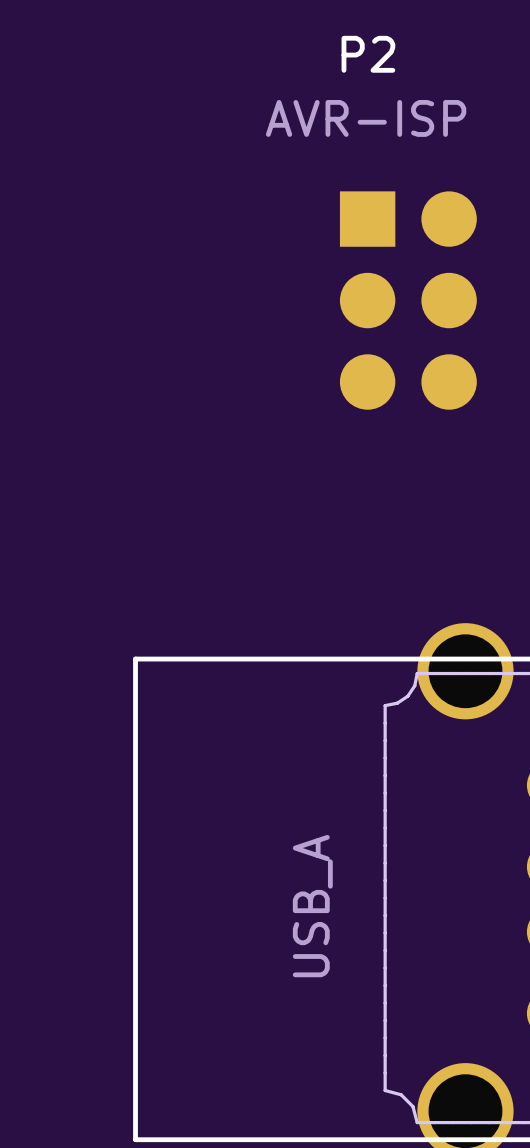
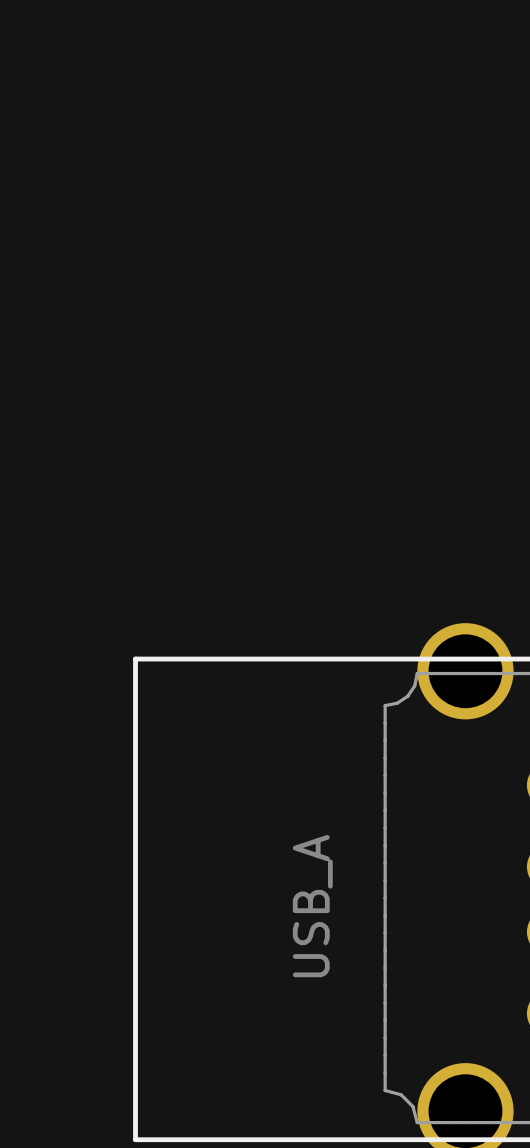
P2: AVR-ISP (408, 300) -> none

